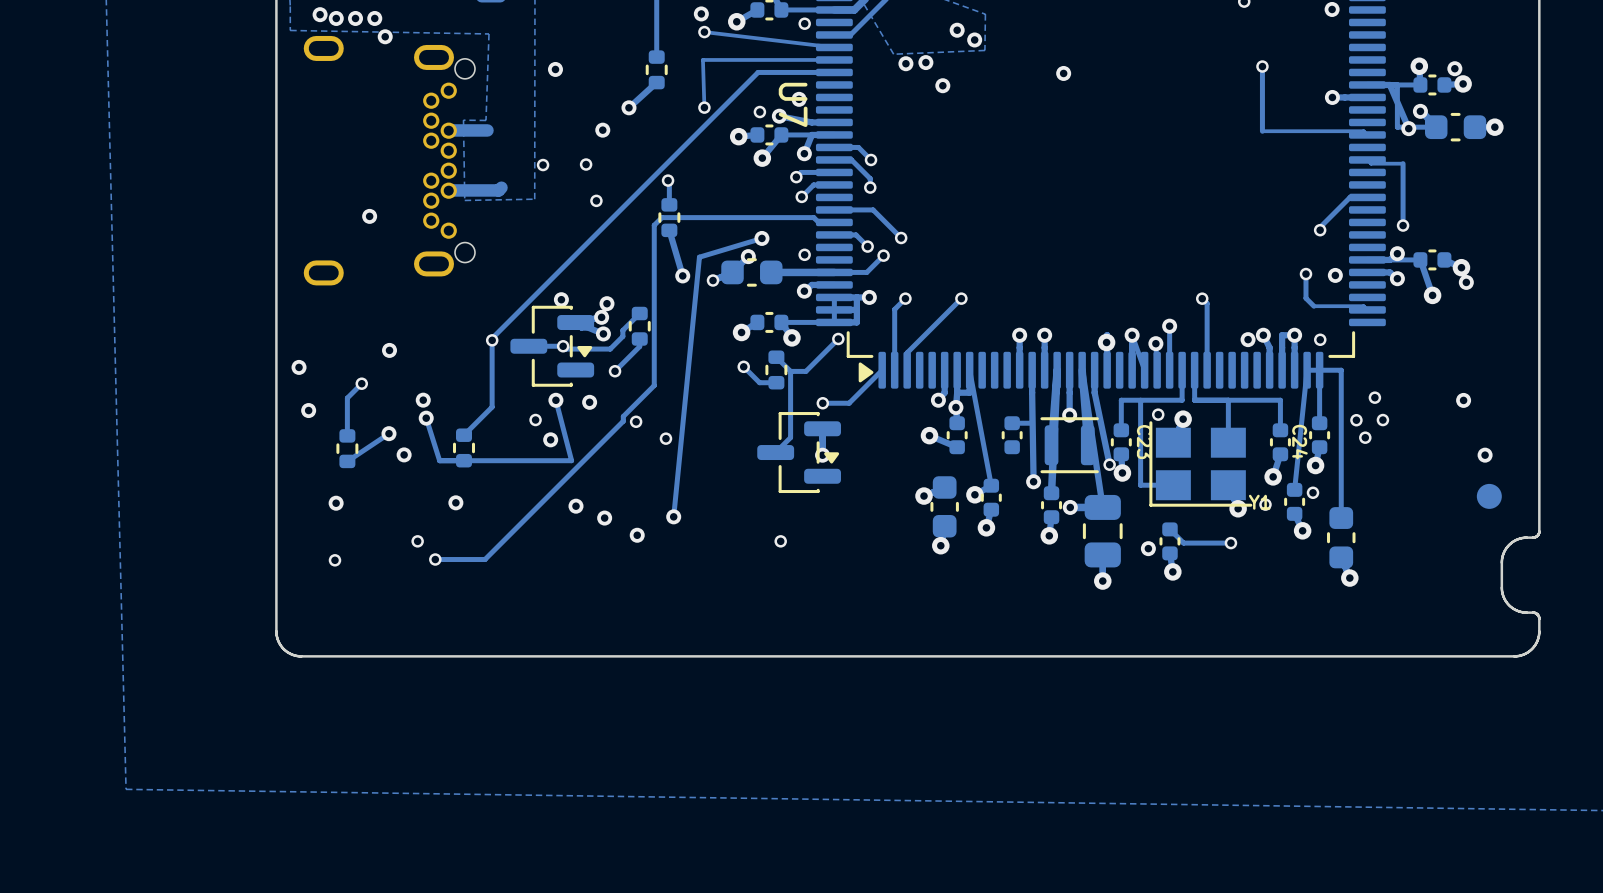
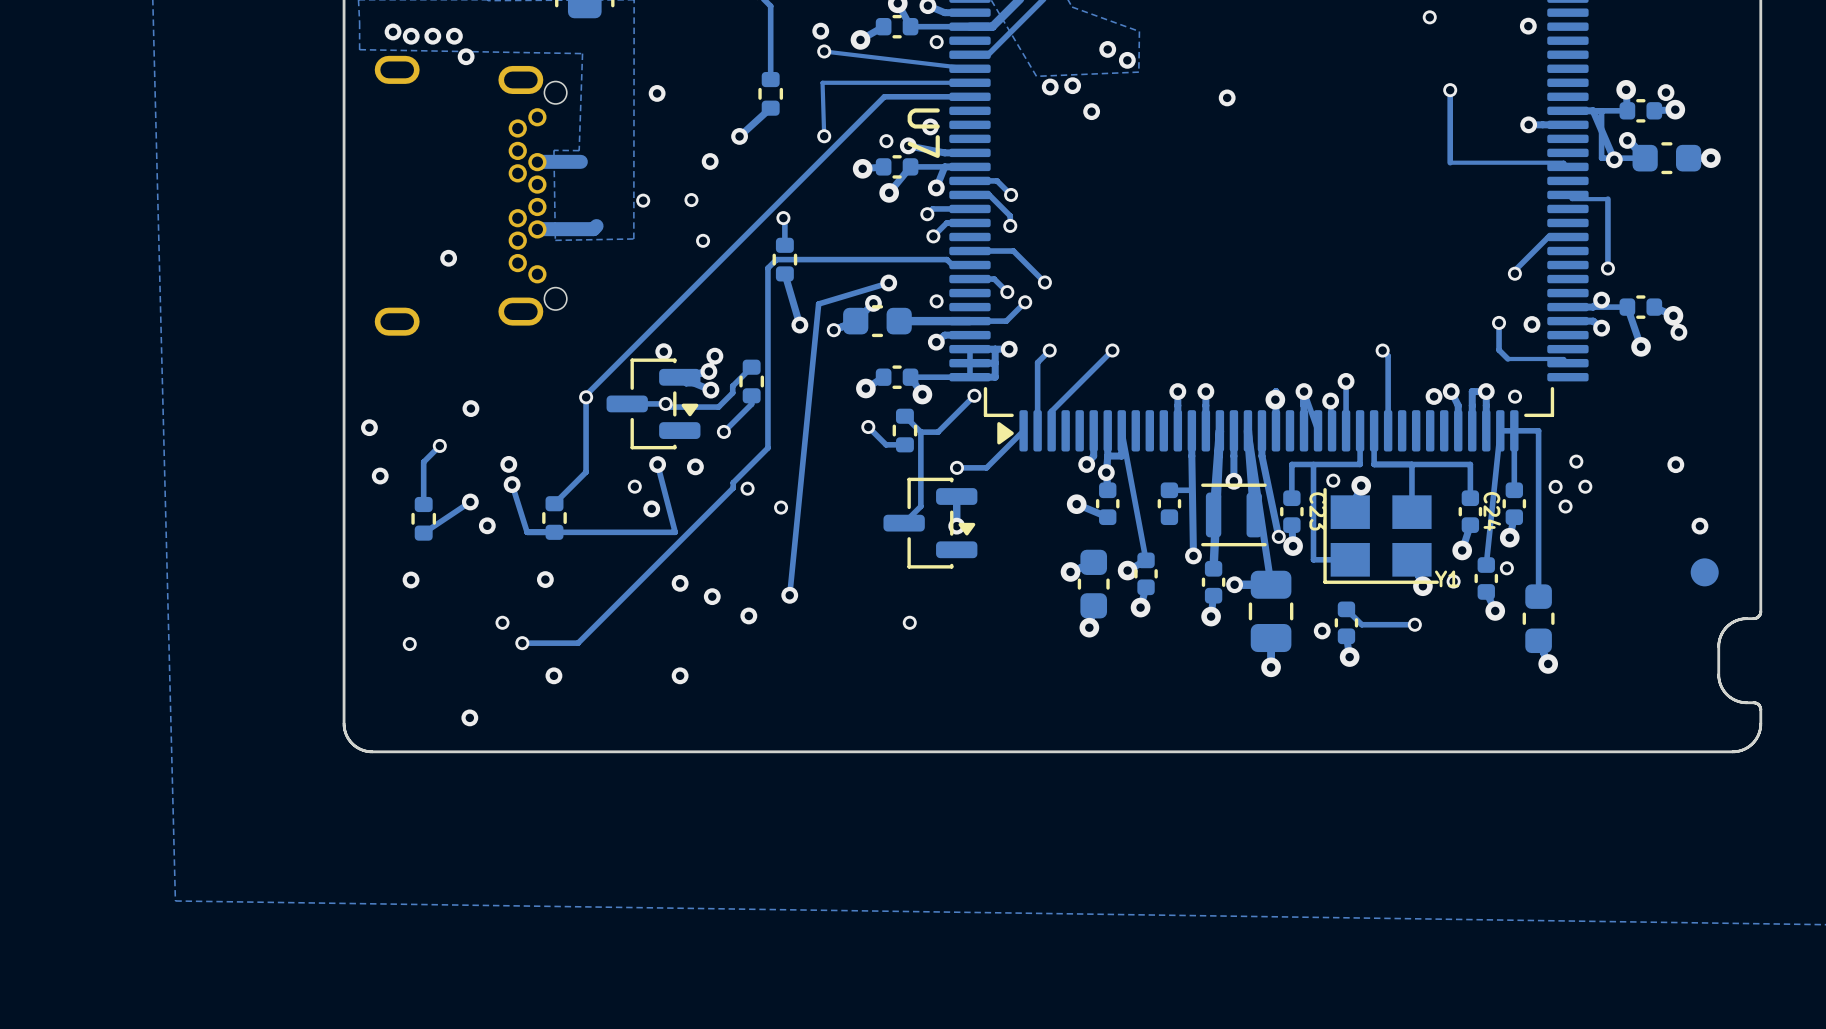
via: none -> (553, 675)
via: none -> (680, 675)
via: none -> (469, 717)

